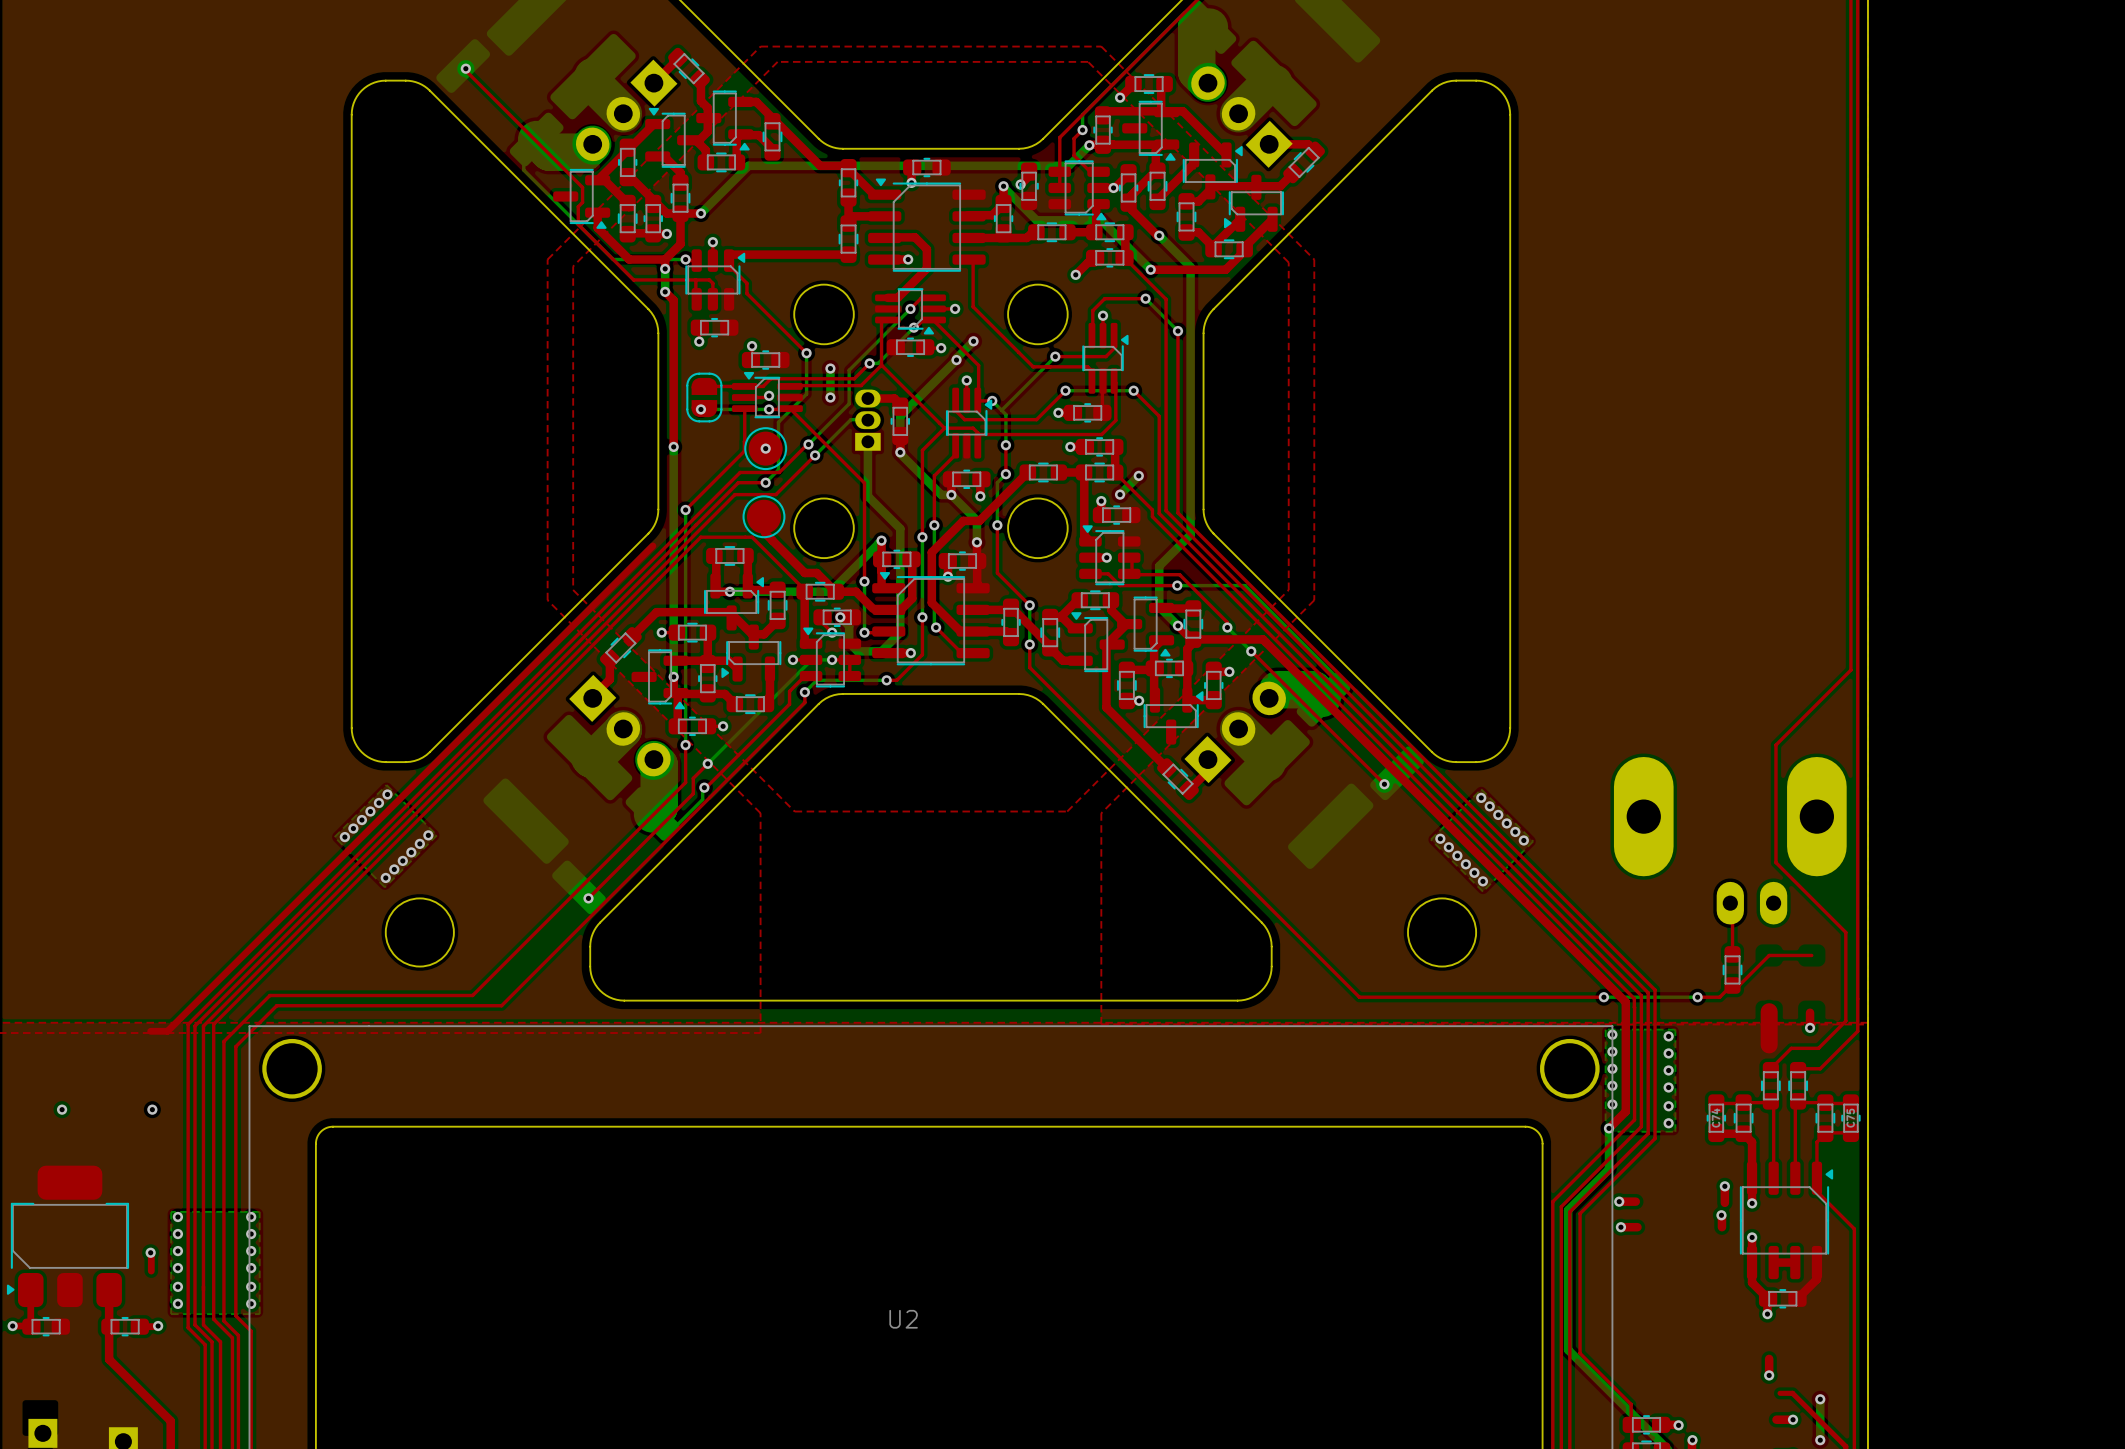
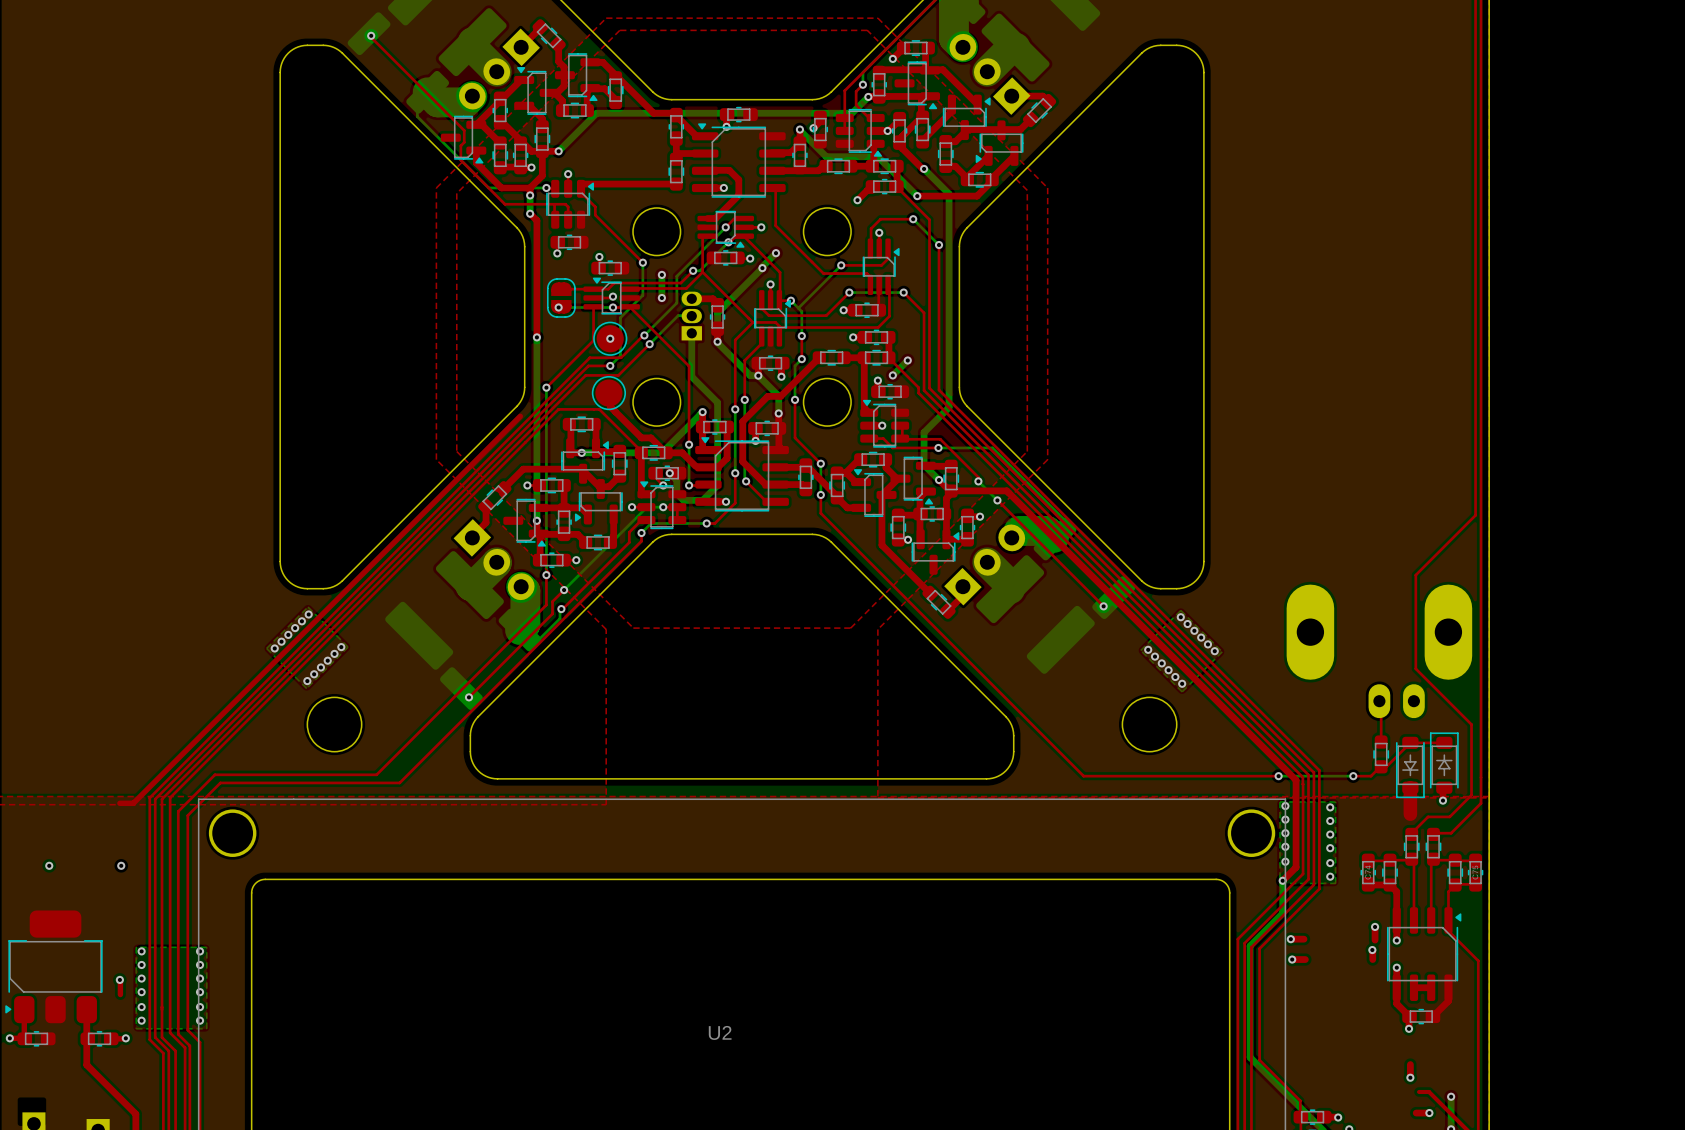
part: none -> (1444, 763)
part: none -> (1410, 767)

